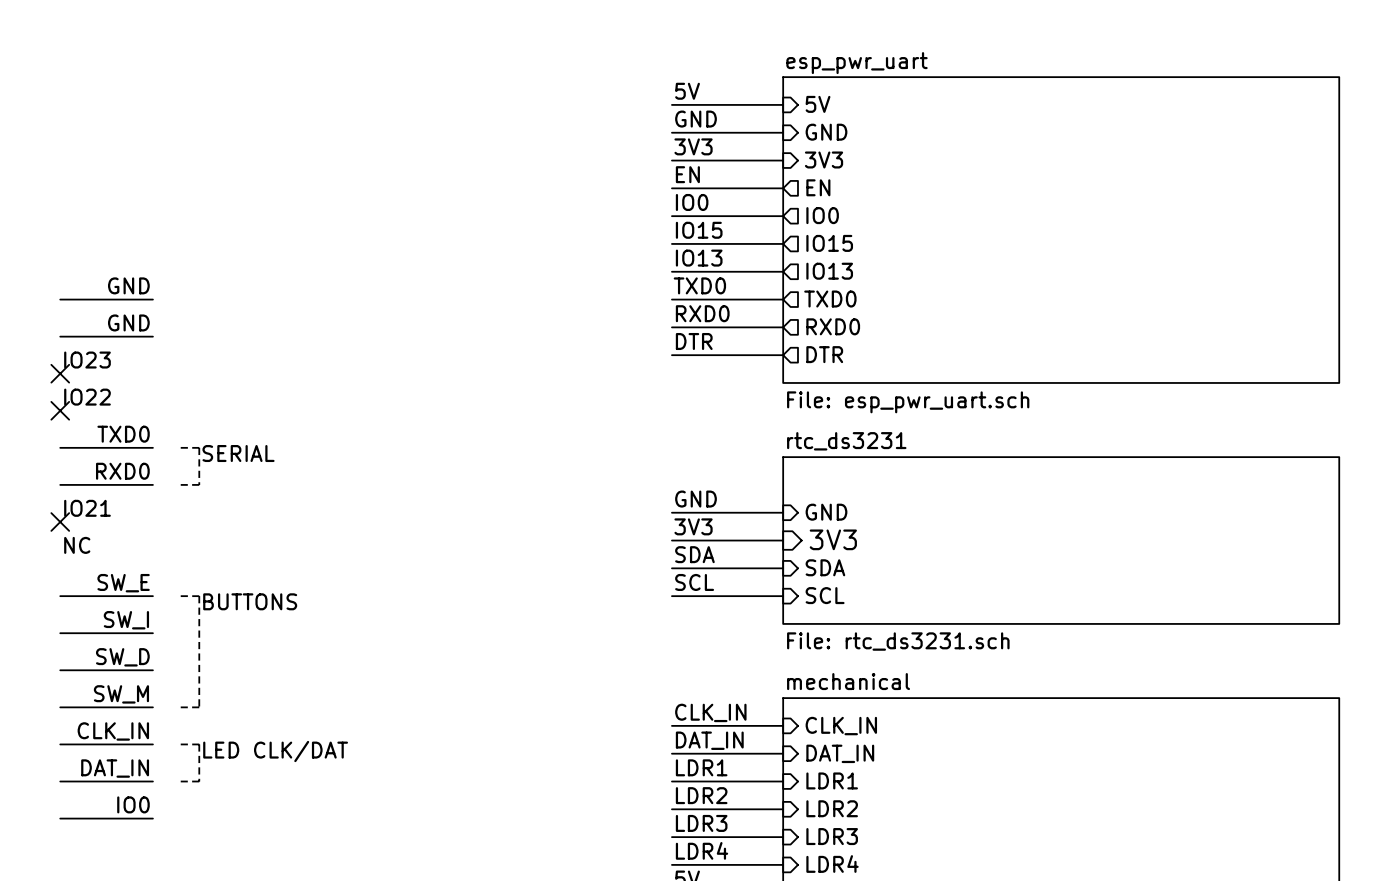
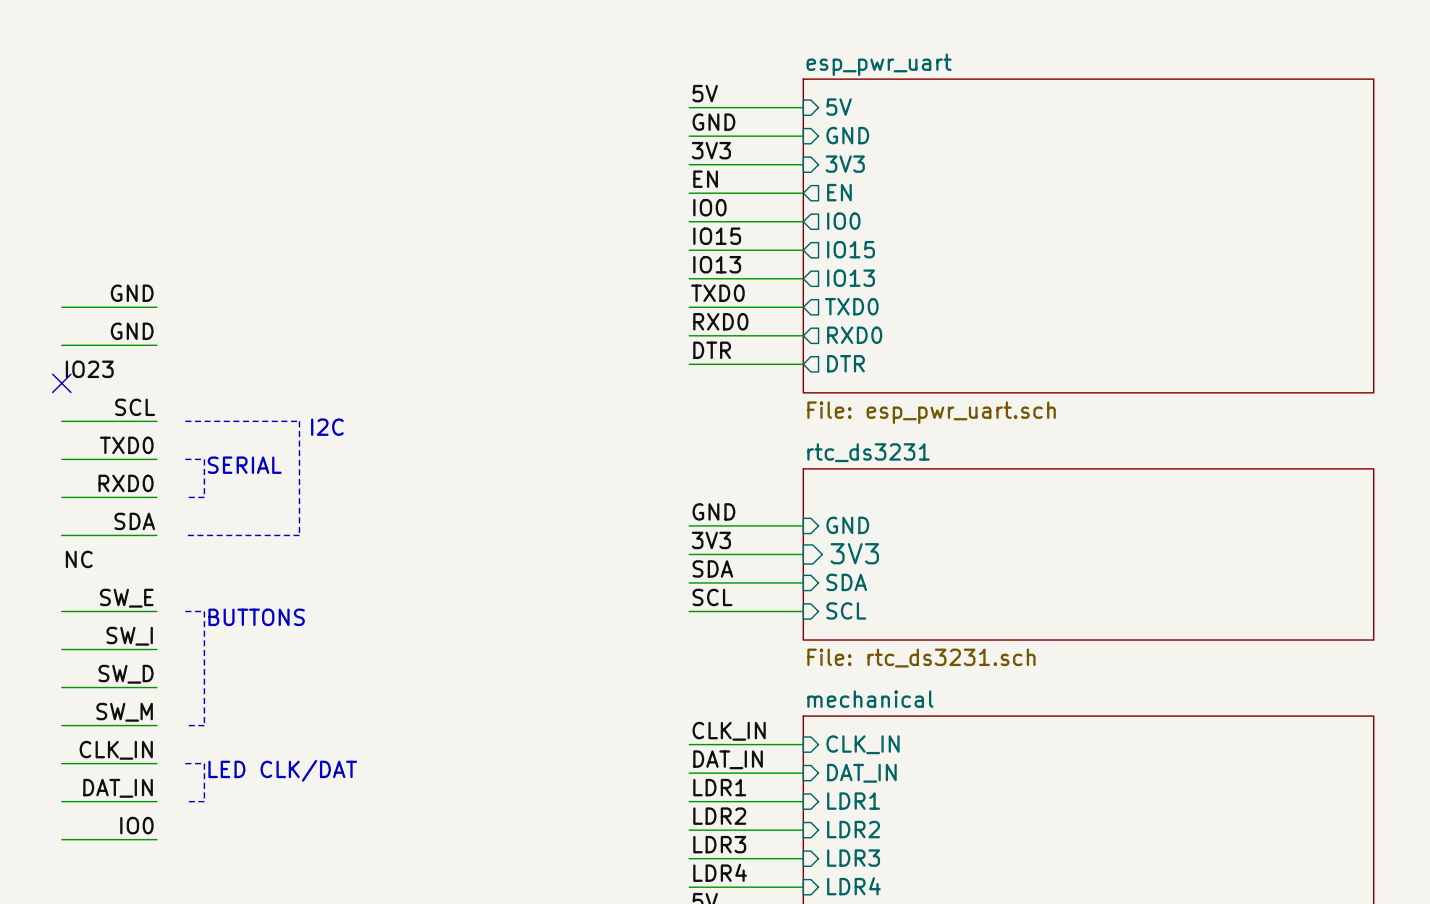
label: IO22 (87, 397) -> none
label: none -> SCL (135, 407)
wire: none -> (61, 421) (156, 421)
no-connect mark: (60, 410) -> none
line: none -> (185, 421) (299, 421) (299, 535) (185, 535)
text: none -> I2C (327, 427)
label: IO21 (87, 508) -> none
label: none -> SDA (134, 521)
wire: none -> (61, 535) (156, 535)
no-connect mark: (60, 522) -> none

